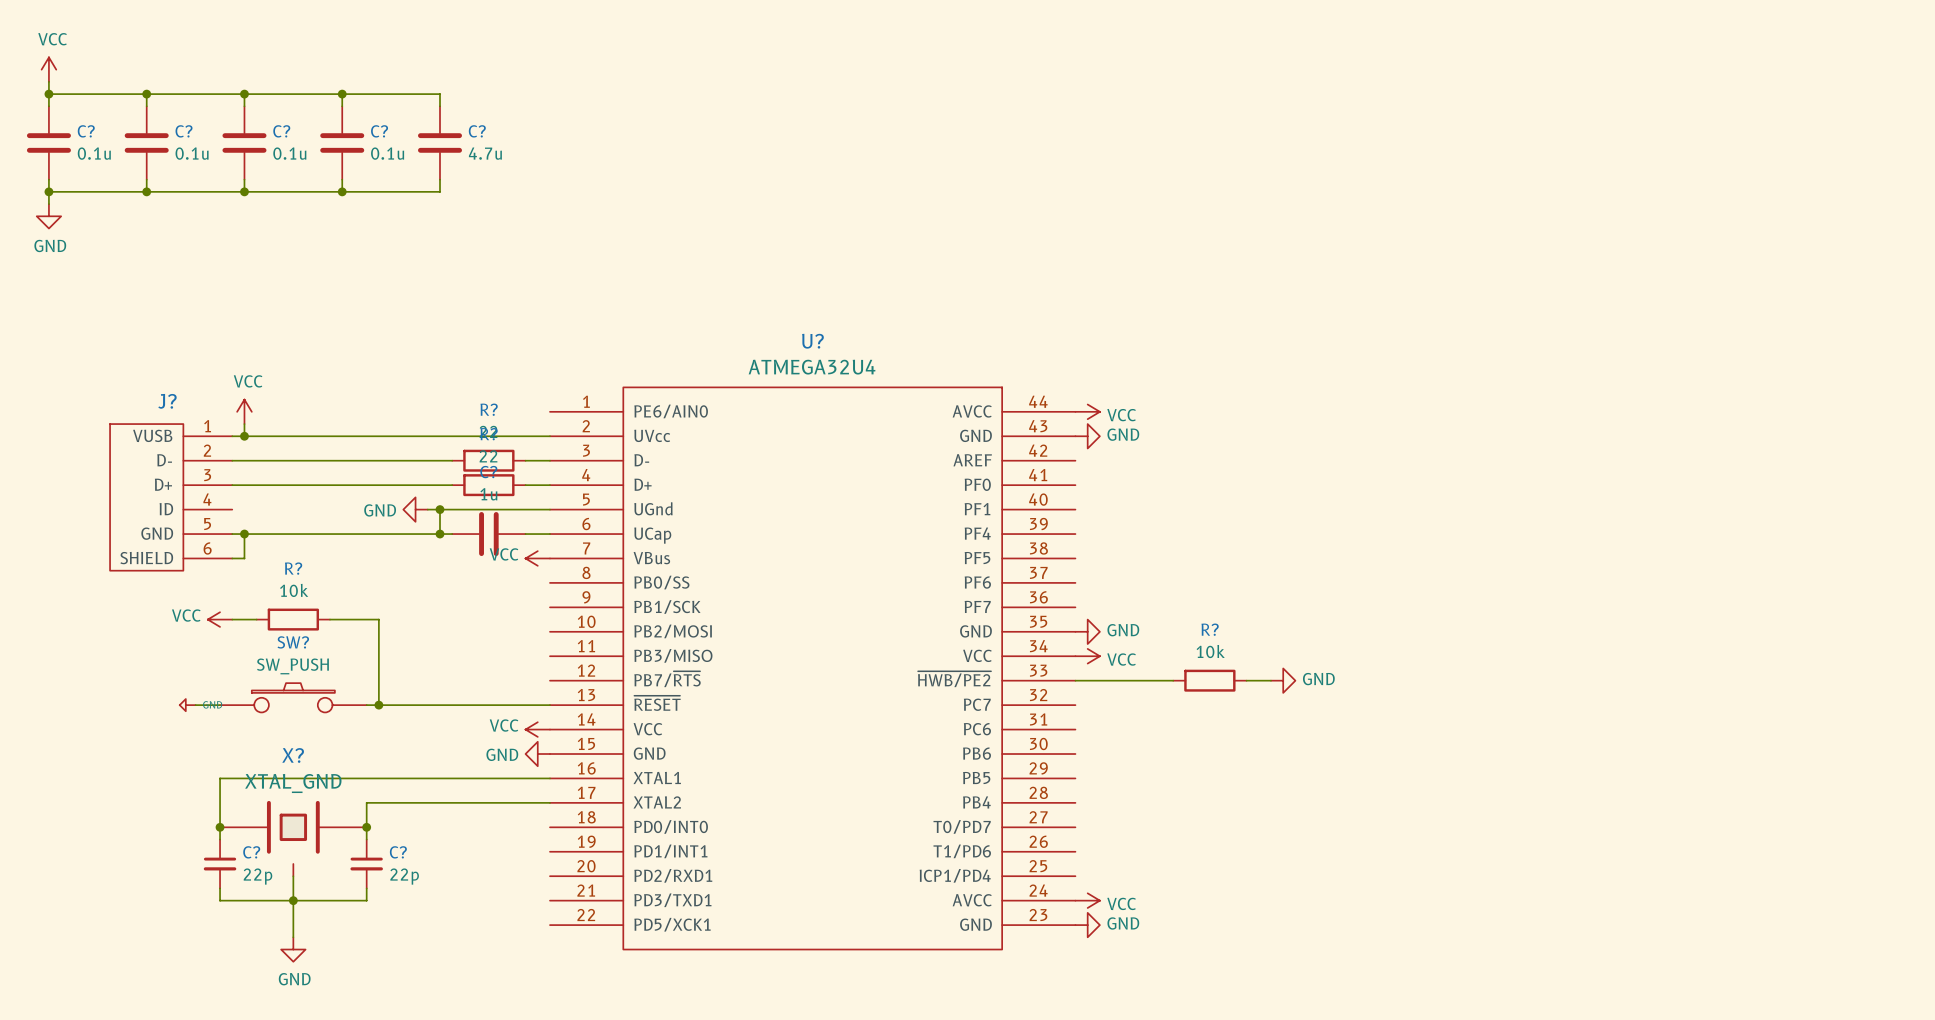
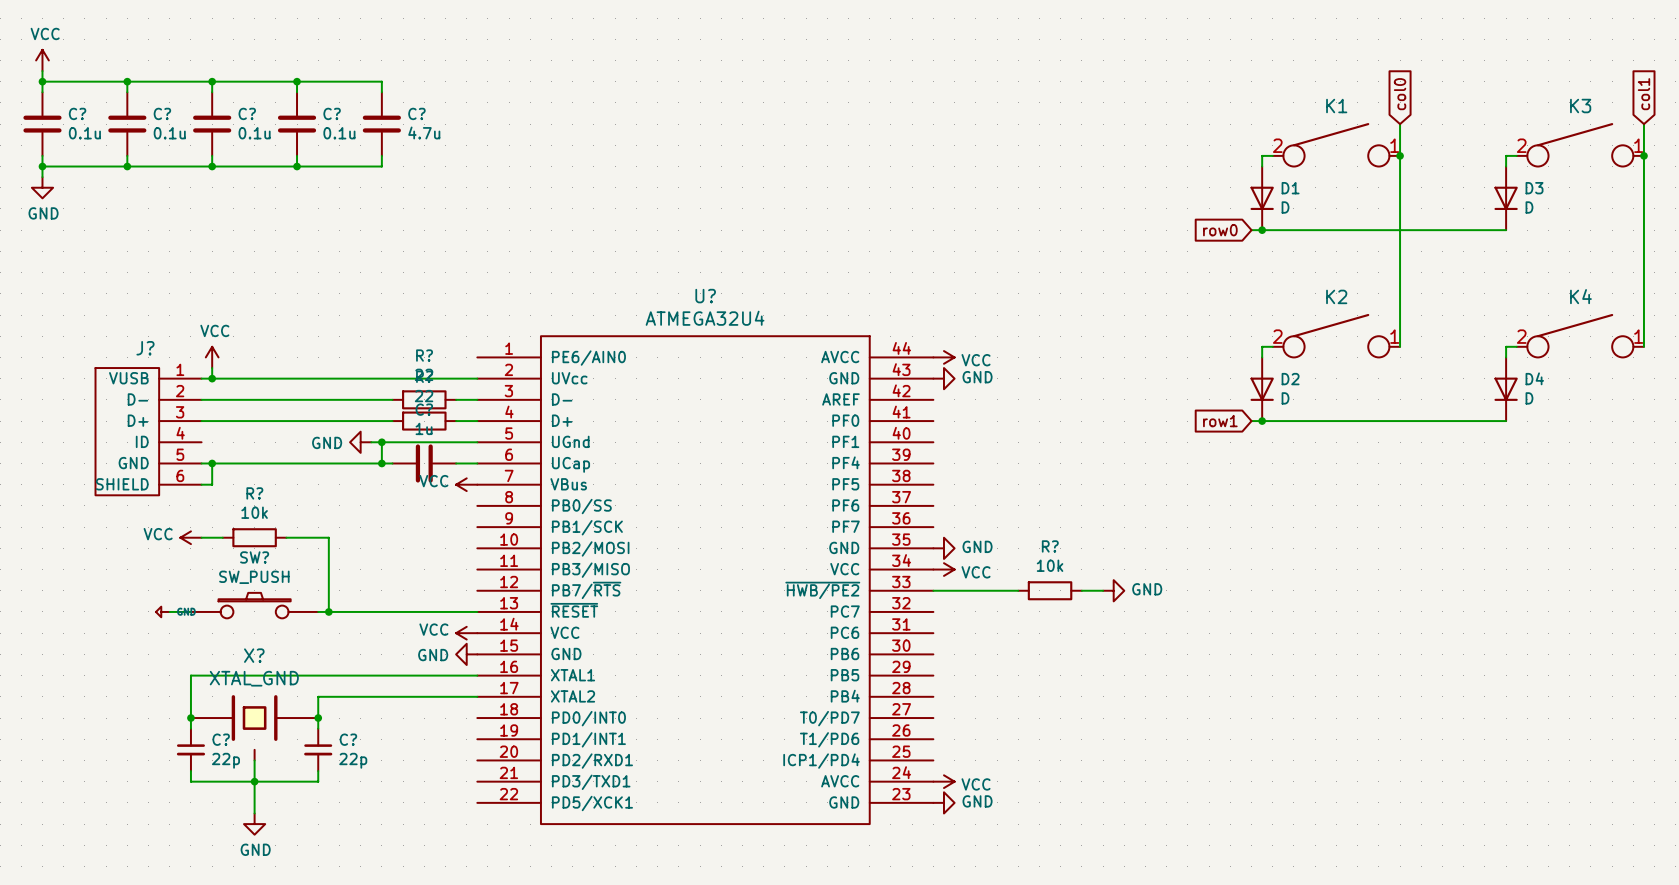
global label: none -> col0 (1400, 94)
global label: none -> col1 (1643, 94)
wire: none -> (1400, 124) (1400, 346)
wire: none -> (1643, 124) (1643, 346)
K1: none -> (1336, 144)
K3: none -> (1580, 144)
wire: none -> (1272, 155) (1262, 155) (1262, 166)
junction: none -> (1400, 155)
wire: none -> (1516, 155) (1506, 155) (1506, 166)
junction: none -> (1643, 155)
D1: none -> D (1262, 198)
D3: none -> D (1506, 198)
global label: none -> row0 (1220, 230)
wire: none -> (1251, 230) (1506, 230)
junction: none -> (1262, 230)
K2: none -> (1336, 335)
K4: none -> (1580, 335)
wire: none -> (1272, 346) (1262, 346) (1262, 357)
wire: none -> (1516, 346) (1506, 346) (1506, 357)
D2: none -> D (1262, 389)
D4: none -> D (1506, 389)
global label: none -> row1 (1220, 421)
wire: none -> (1251, 421) (1506, 421)
junction: none -> (1262, 421)

